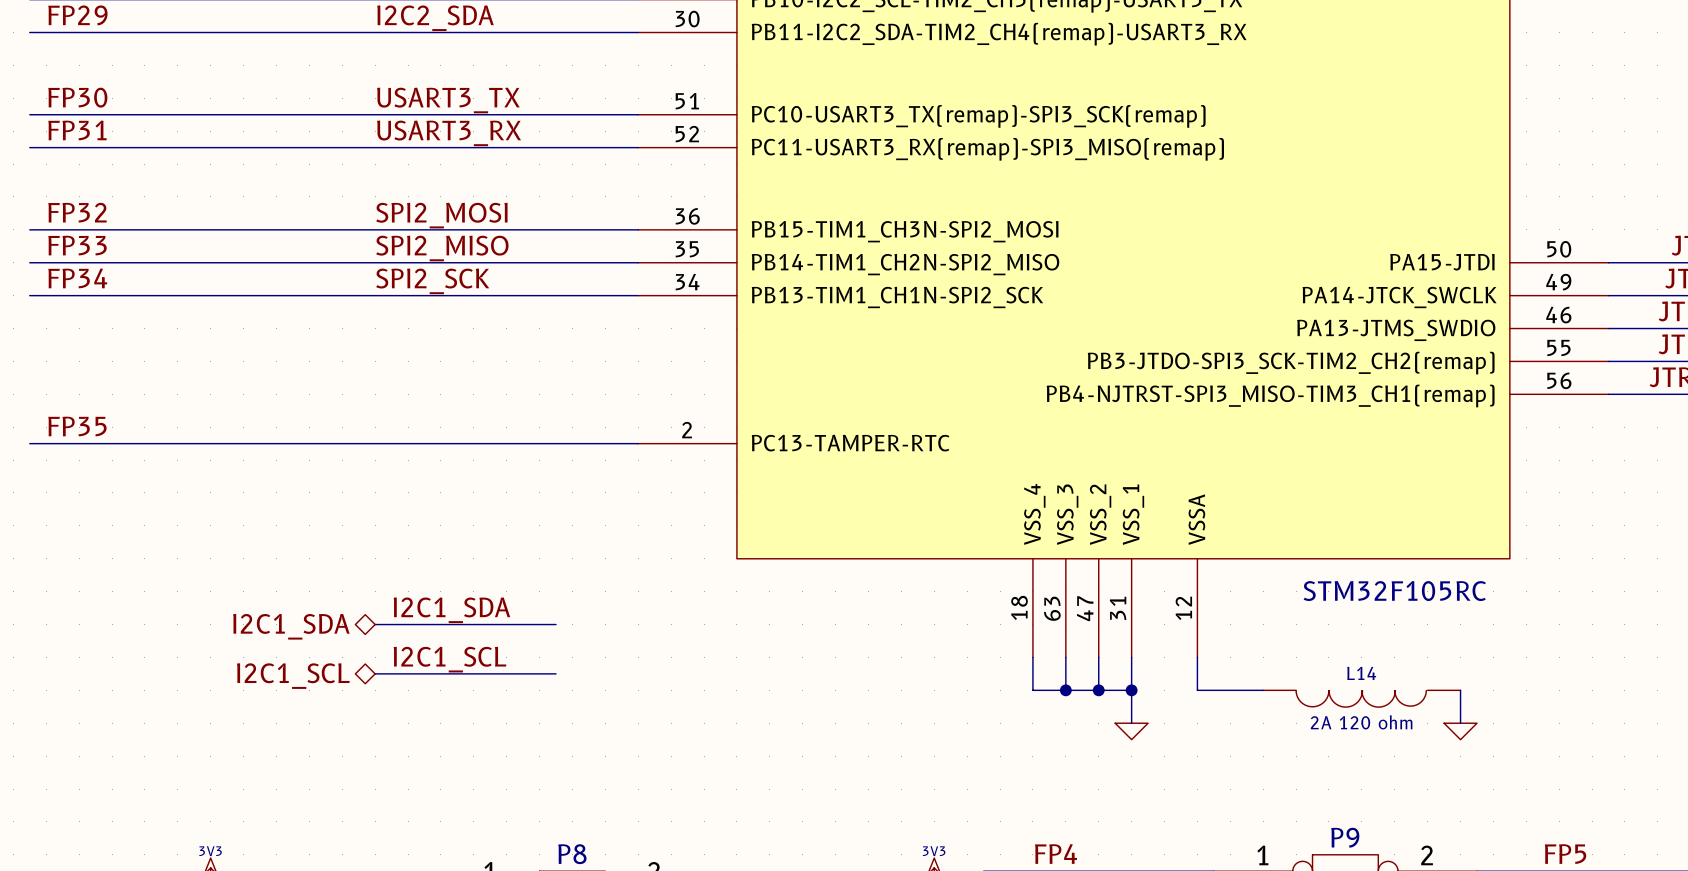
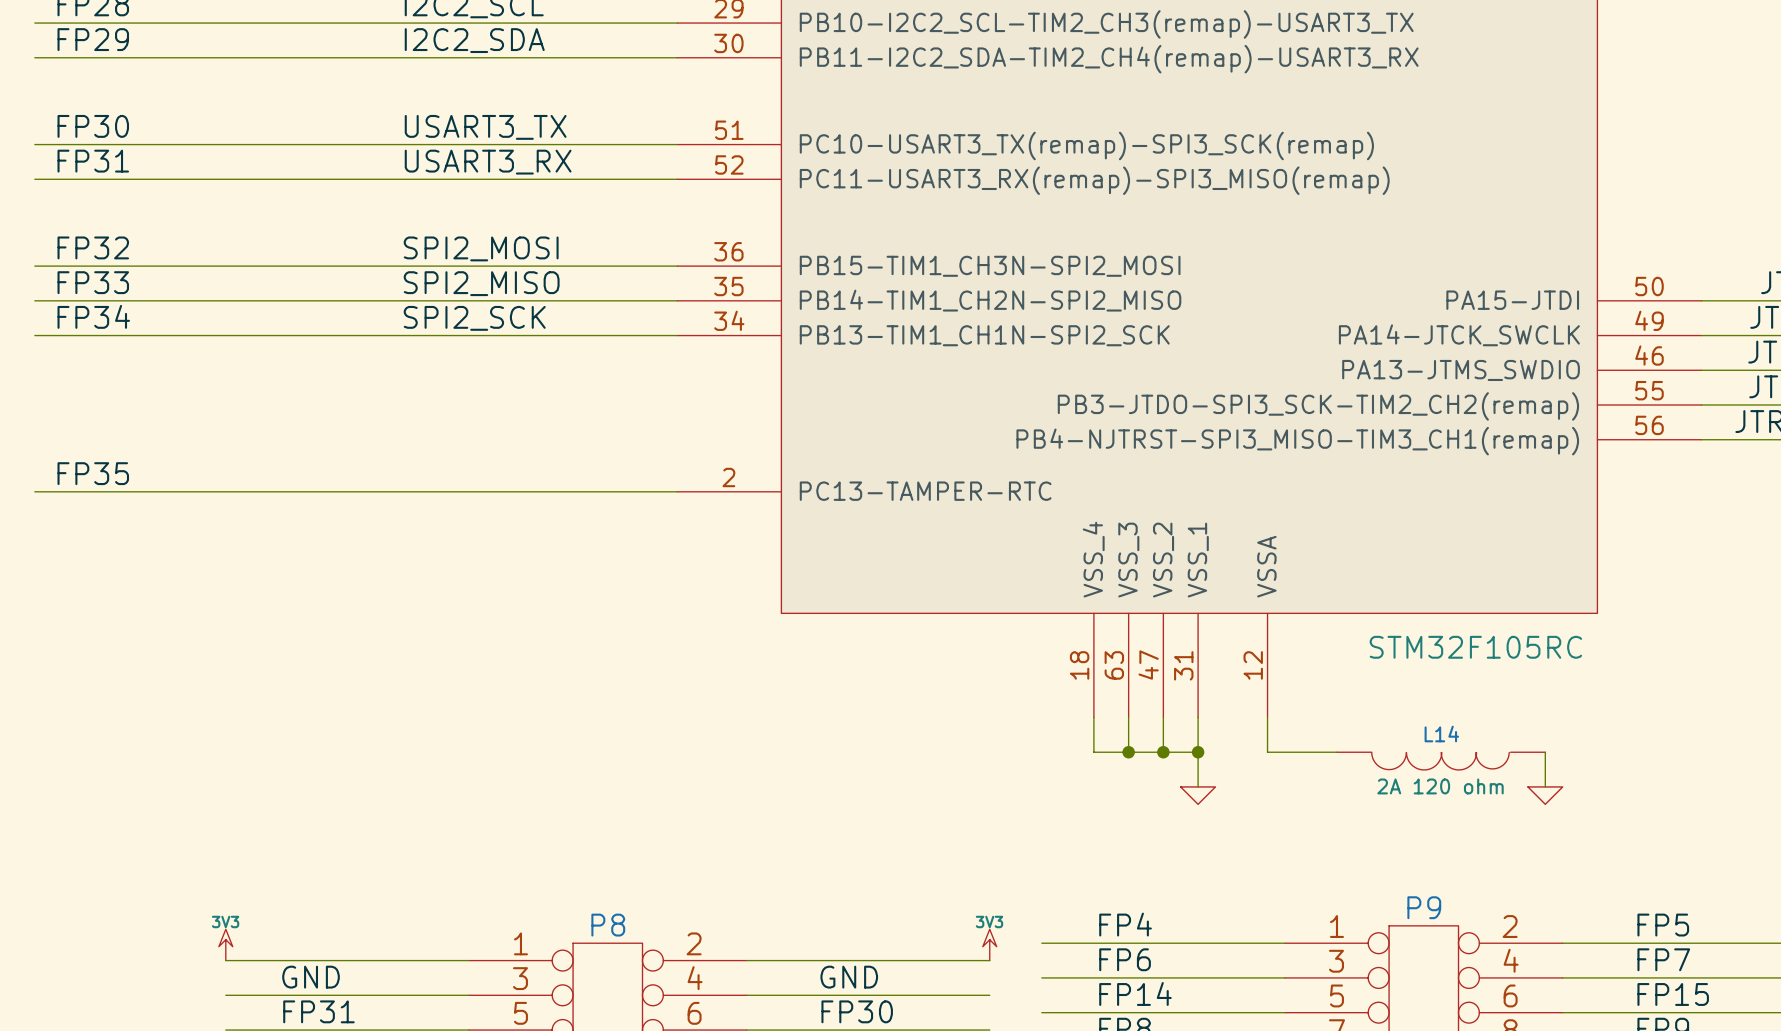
label: I2C1_SDA (451, 610) -> none
wire: (375, 624) (556, 624) -> none
hierarchical label: I2C1_SDA (291, 626) -> none
label: I2C1_SCL (450, 659) -> none
wire: (375, 673) (556, 673) -> none
hierarchical label: I2C1_SCL (293, 676) -> none

